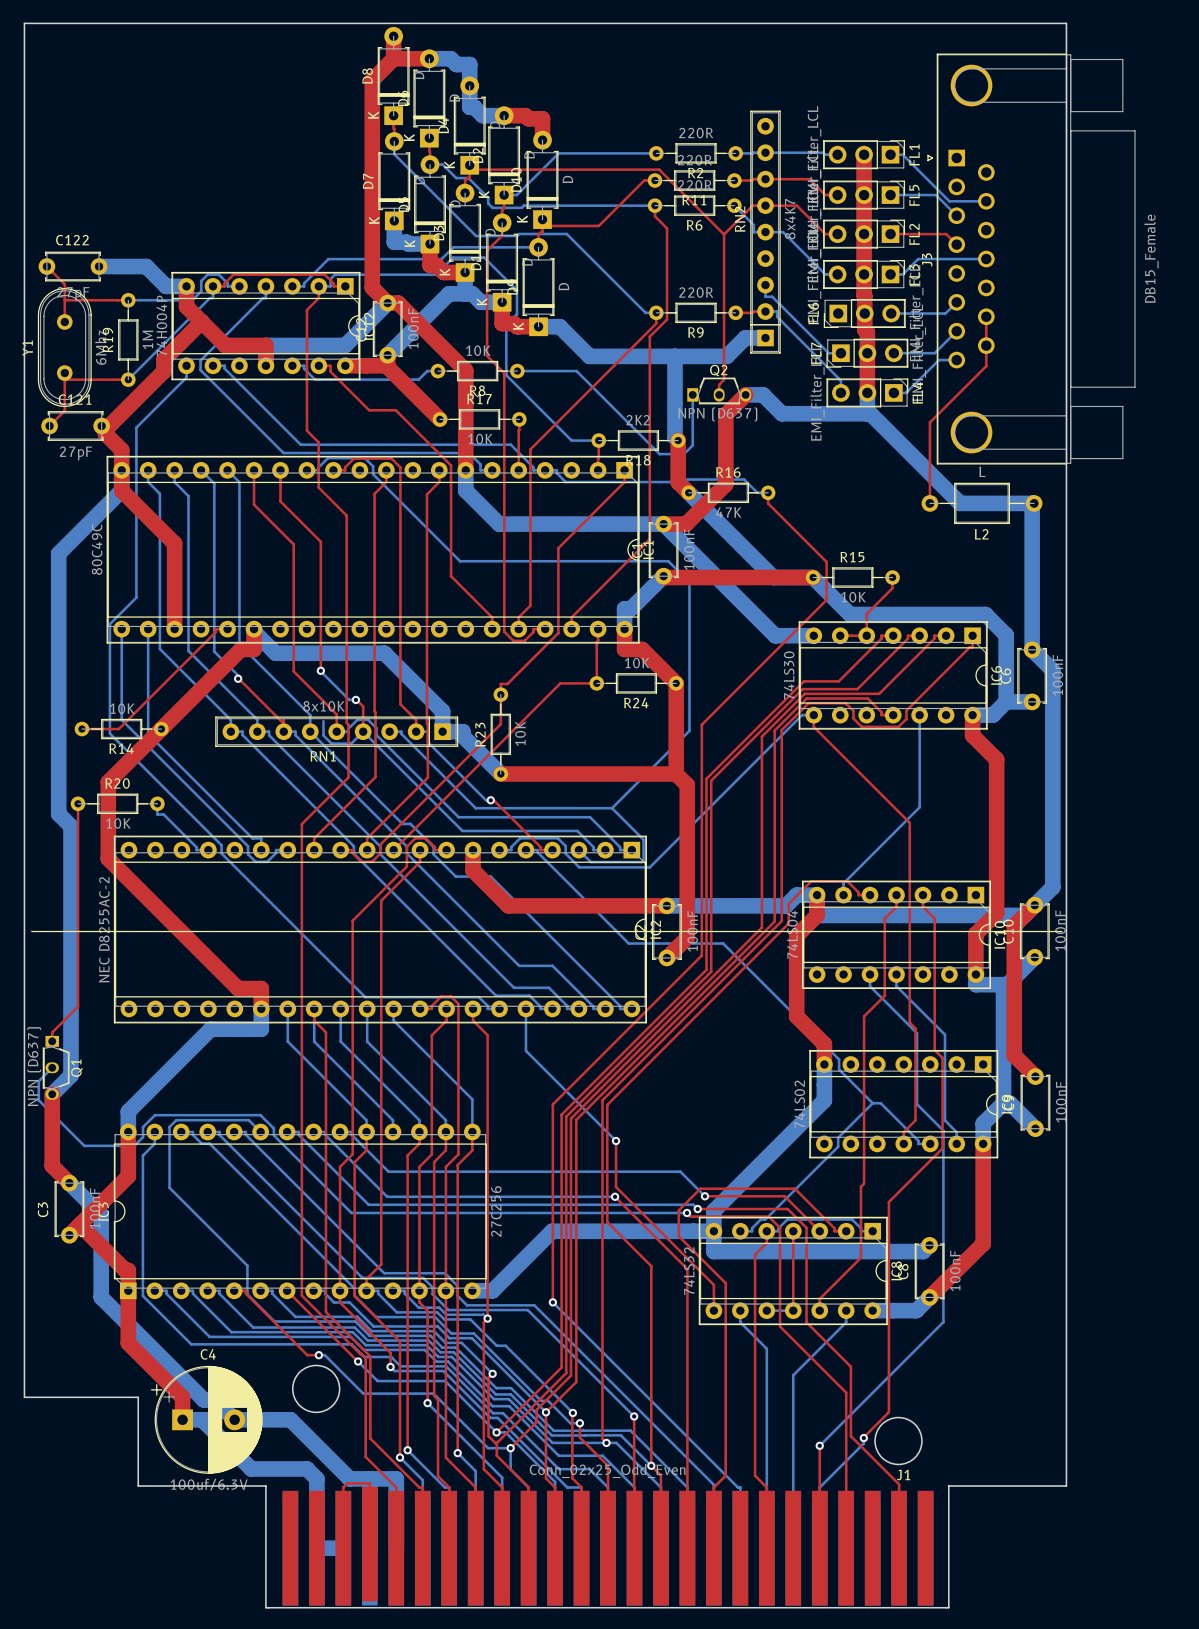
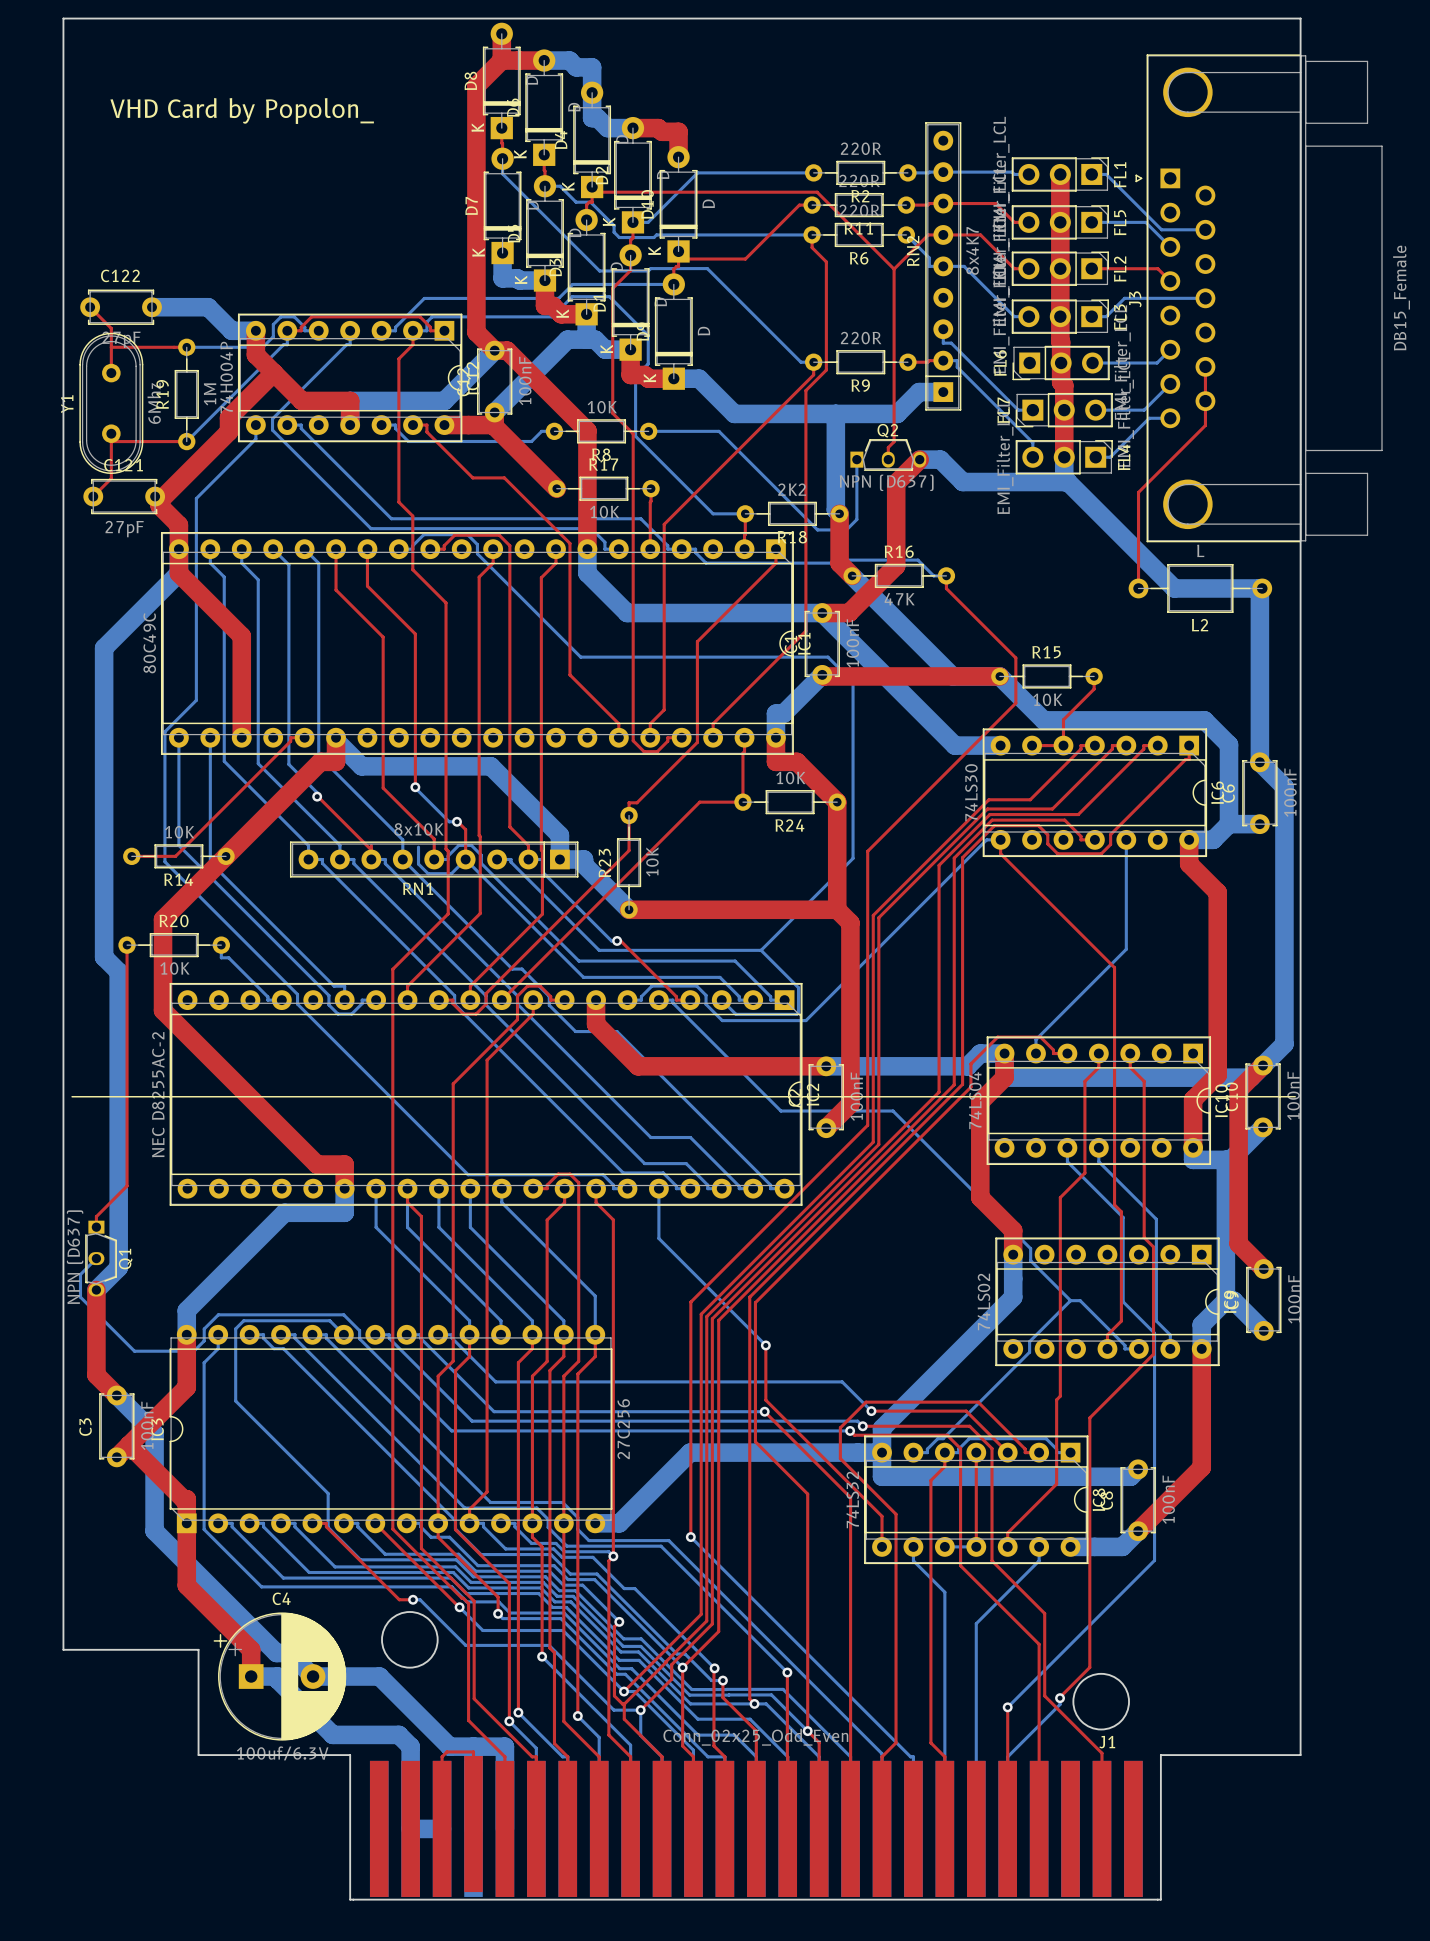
text: none -> VHD Card by Popolon_ (242, 111)

